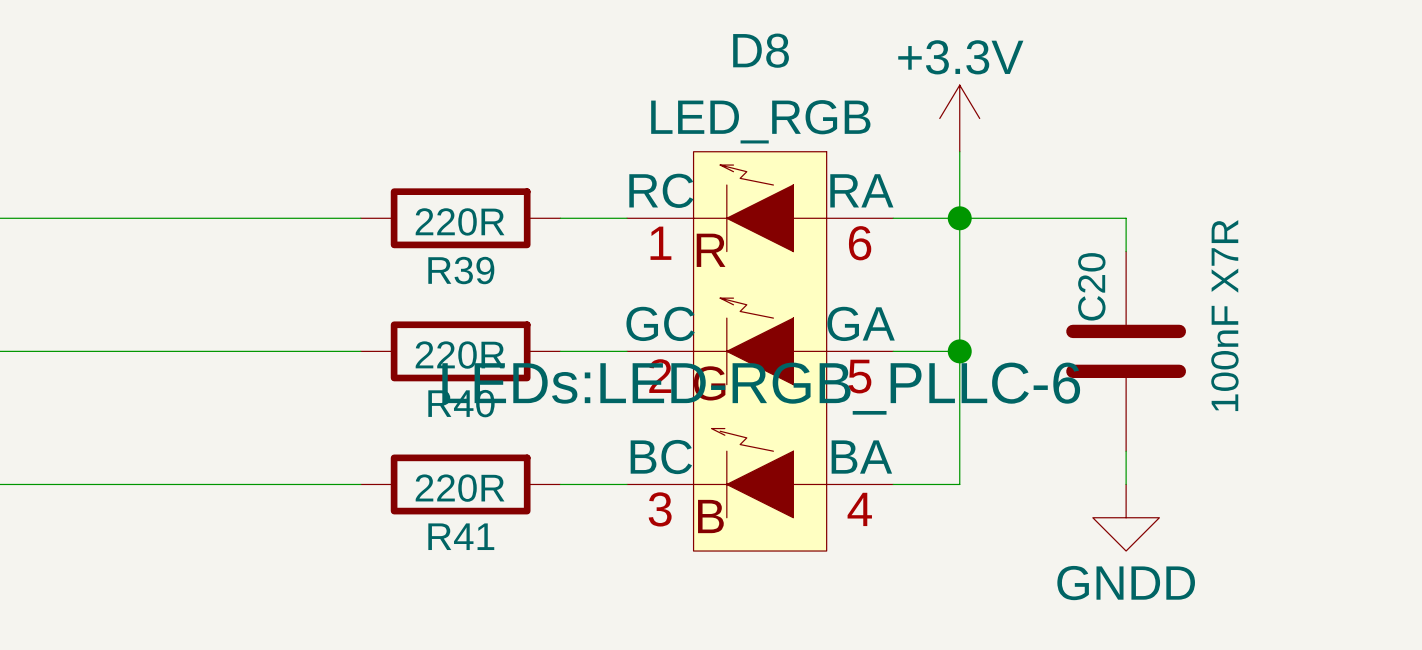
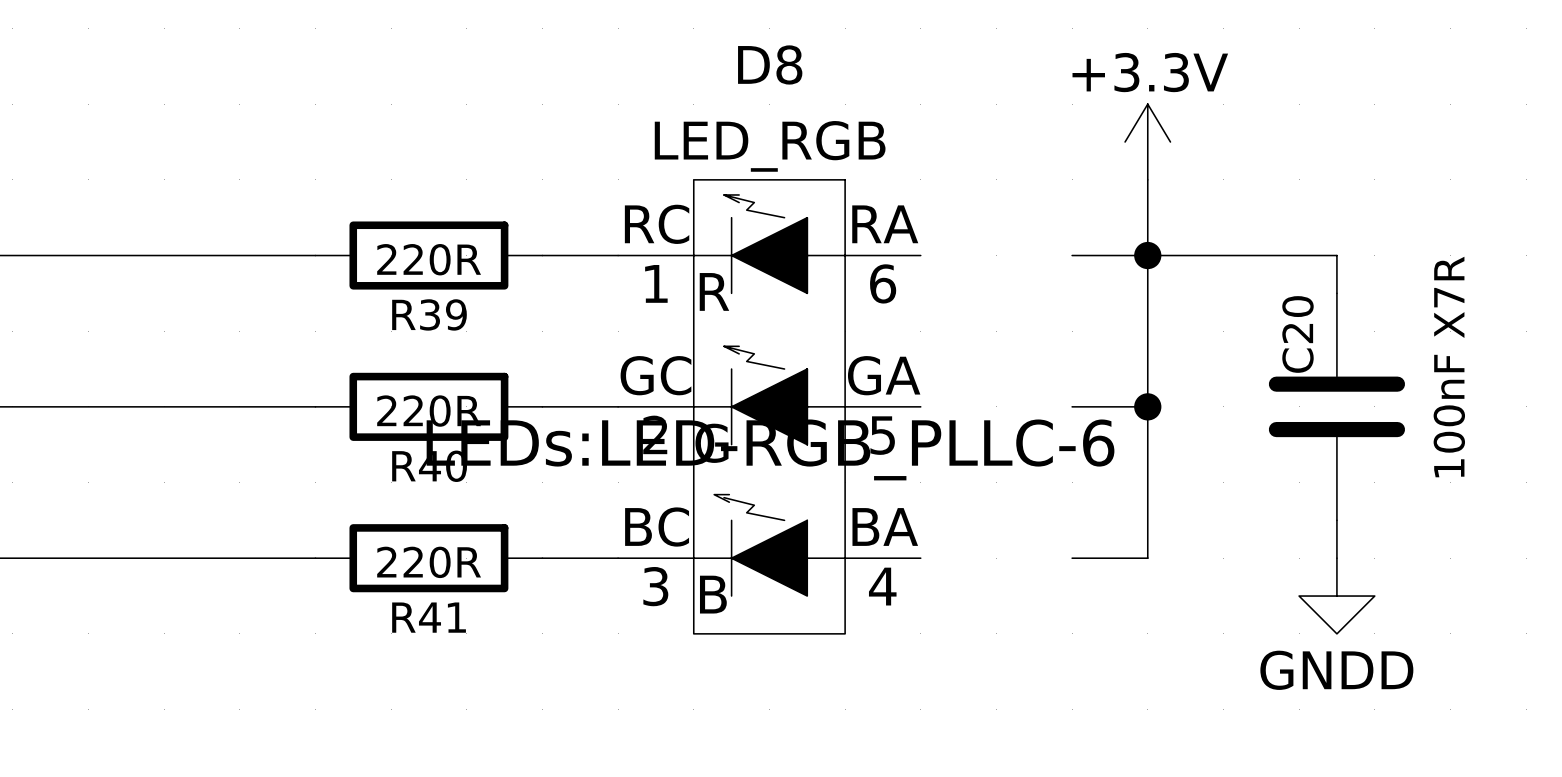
power symbol position: +3.3V (959, 118) -> +3.3V (1147, 142)
wire: (959, 151) (959, 484) (893, 484) -> (1147, 179) (1147, 558) (1072, 558)
wire: (893, 218) (1026, 218) -> none
junction: (959, 218) -> none
junction: none -> (1147, 255)
wire: (1126, 218) (1126, 251) -> (1185, 255) (1336, 255) (1336, 293)
wire: (893, 351) (959, 351) -> (1072, 406) (1147, 406)
junction: (959, 351) -> none
junction: none -> (1147, 406)
C20 position: (1126, 351) -> (1336, 406)
wire: (1126, 451) (1126, 484) -> (1336, 520) (1336, 558)
power symbol position: GNDD (1126, 517) -> GNDD (1336, 596)

